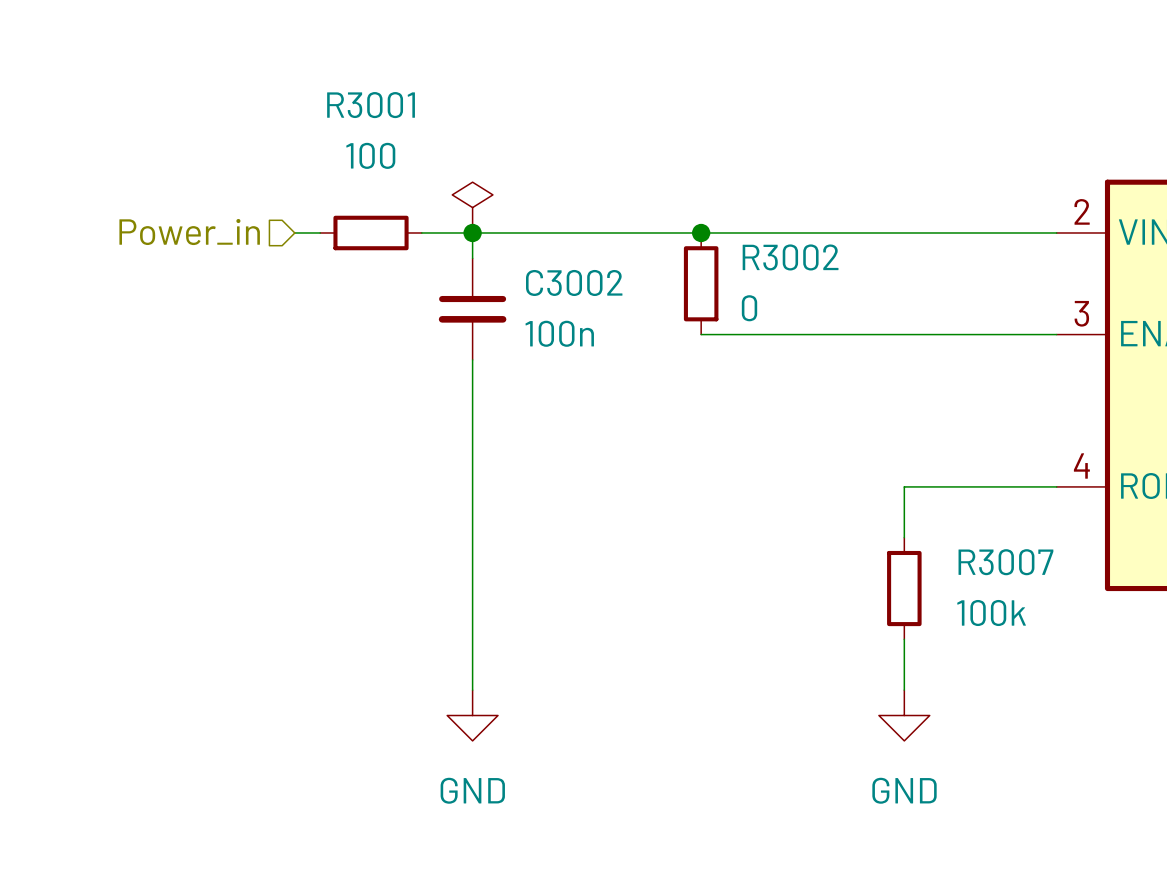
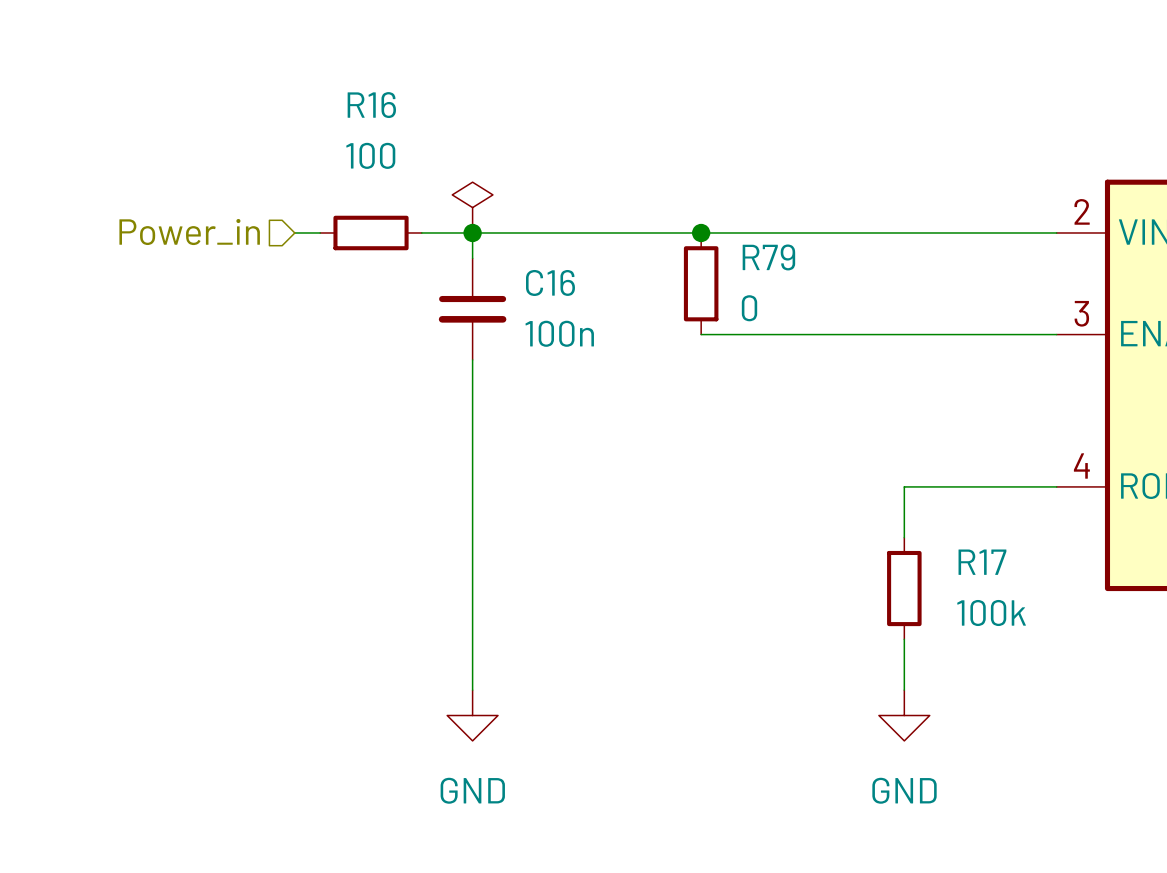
R3001 name: R3001 (371, 105) -> R16 (371, 105)
R3002 name: R3002 (790, 257) -> R79 (768, 257)
C3002 name: C3002 (574, 282) -> C16 (550, 282)
R3007 name: R3007 (1005, 562) -> R17 (982, 562)

